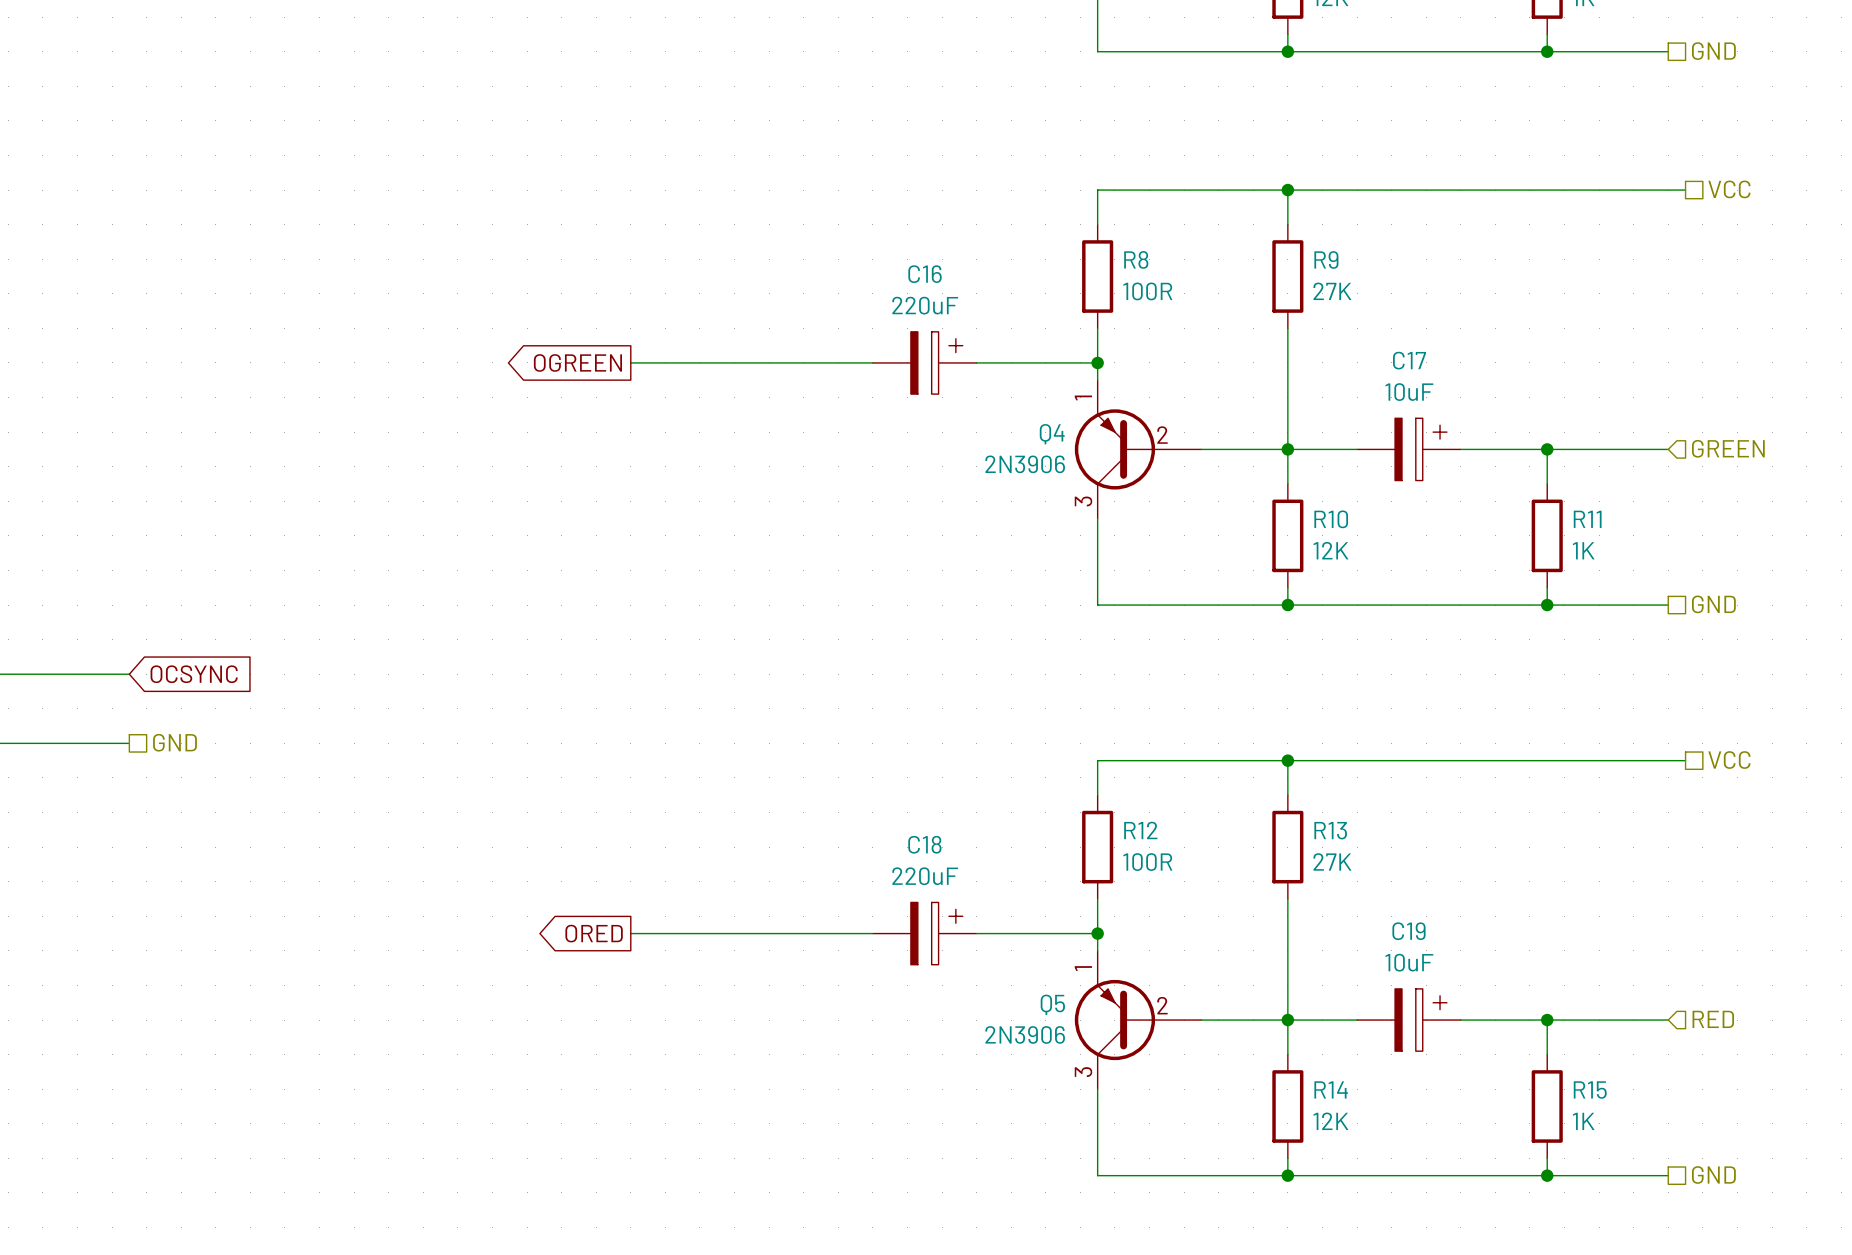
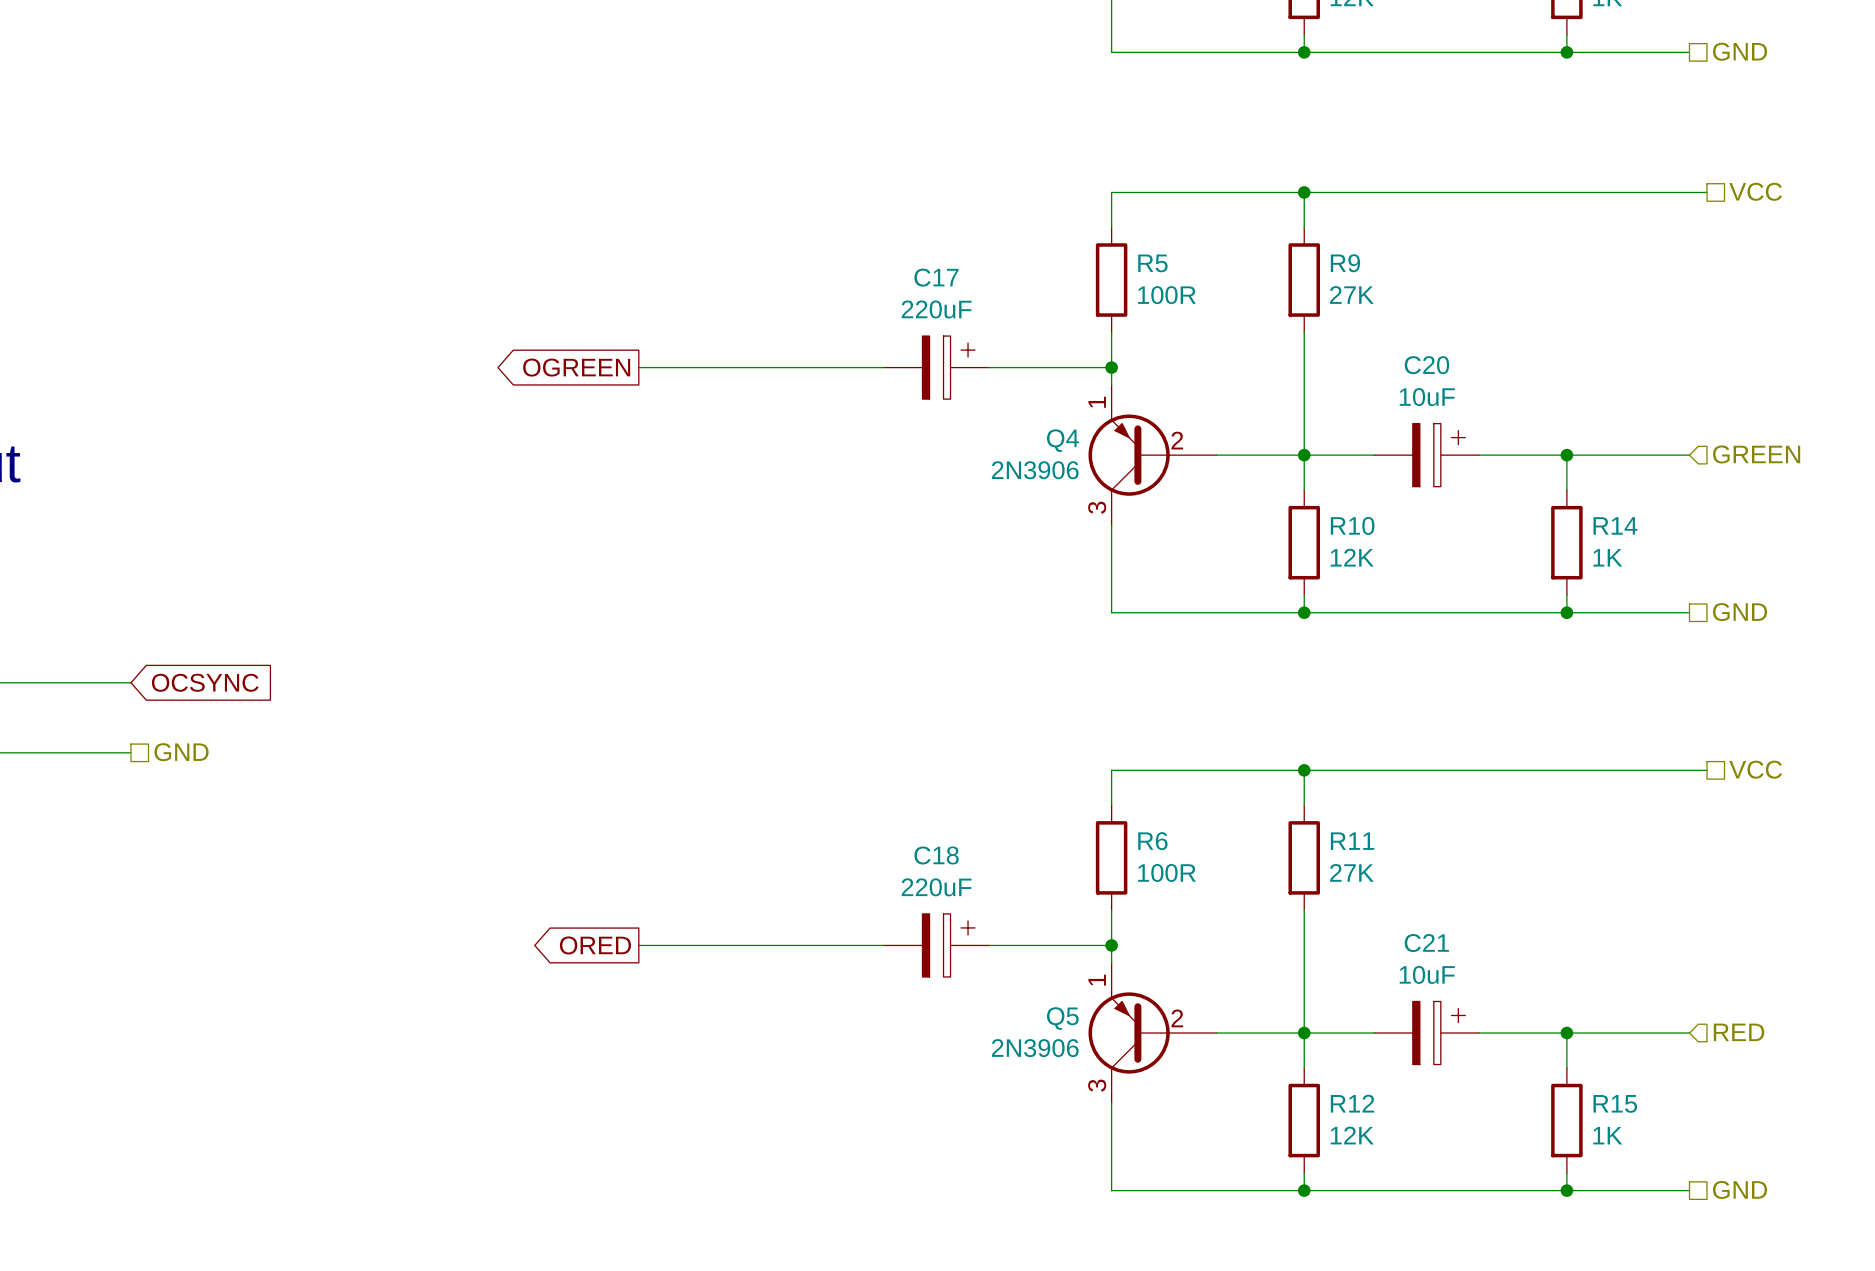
R8 name: R8 (1136, 259) -> R5 (1152, 263)
C16 name: C16 (925, 274) -> C17 (936, 277)
C17 name: C17 (1409, 360) -> C20 (1426, 365)
R11 name: R11 (1587, 519) -> R14 (1615, 525)
R12 name: R12 (1140, 830) -> R6 (1152, 841)
R13 name: R13 (1330, 830) -> R11 (1352, 841)
C19 name: C19 (1408, 931) -> C21 (1426, 943)
R14 name: R14 (1331, 1089) -> R12 (1352, 1103)

